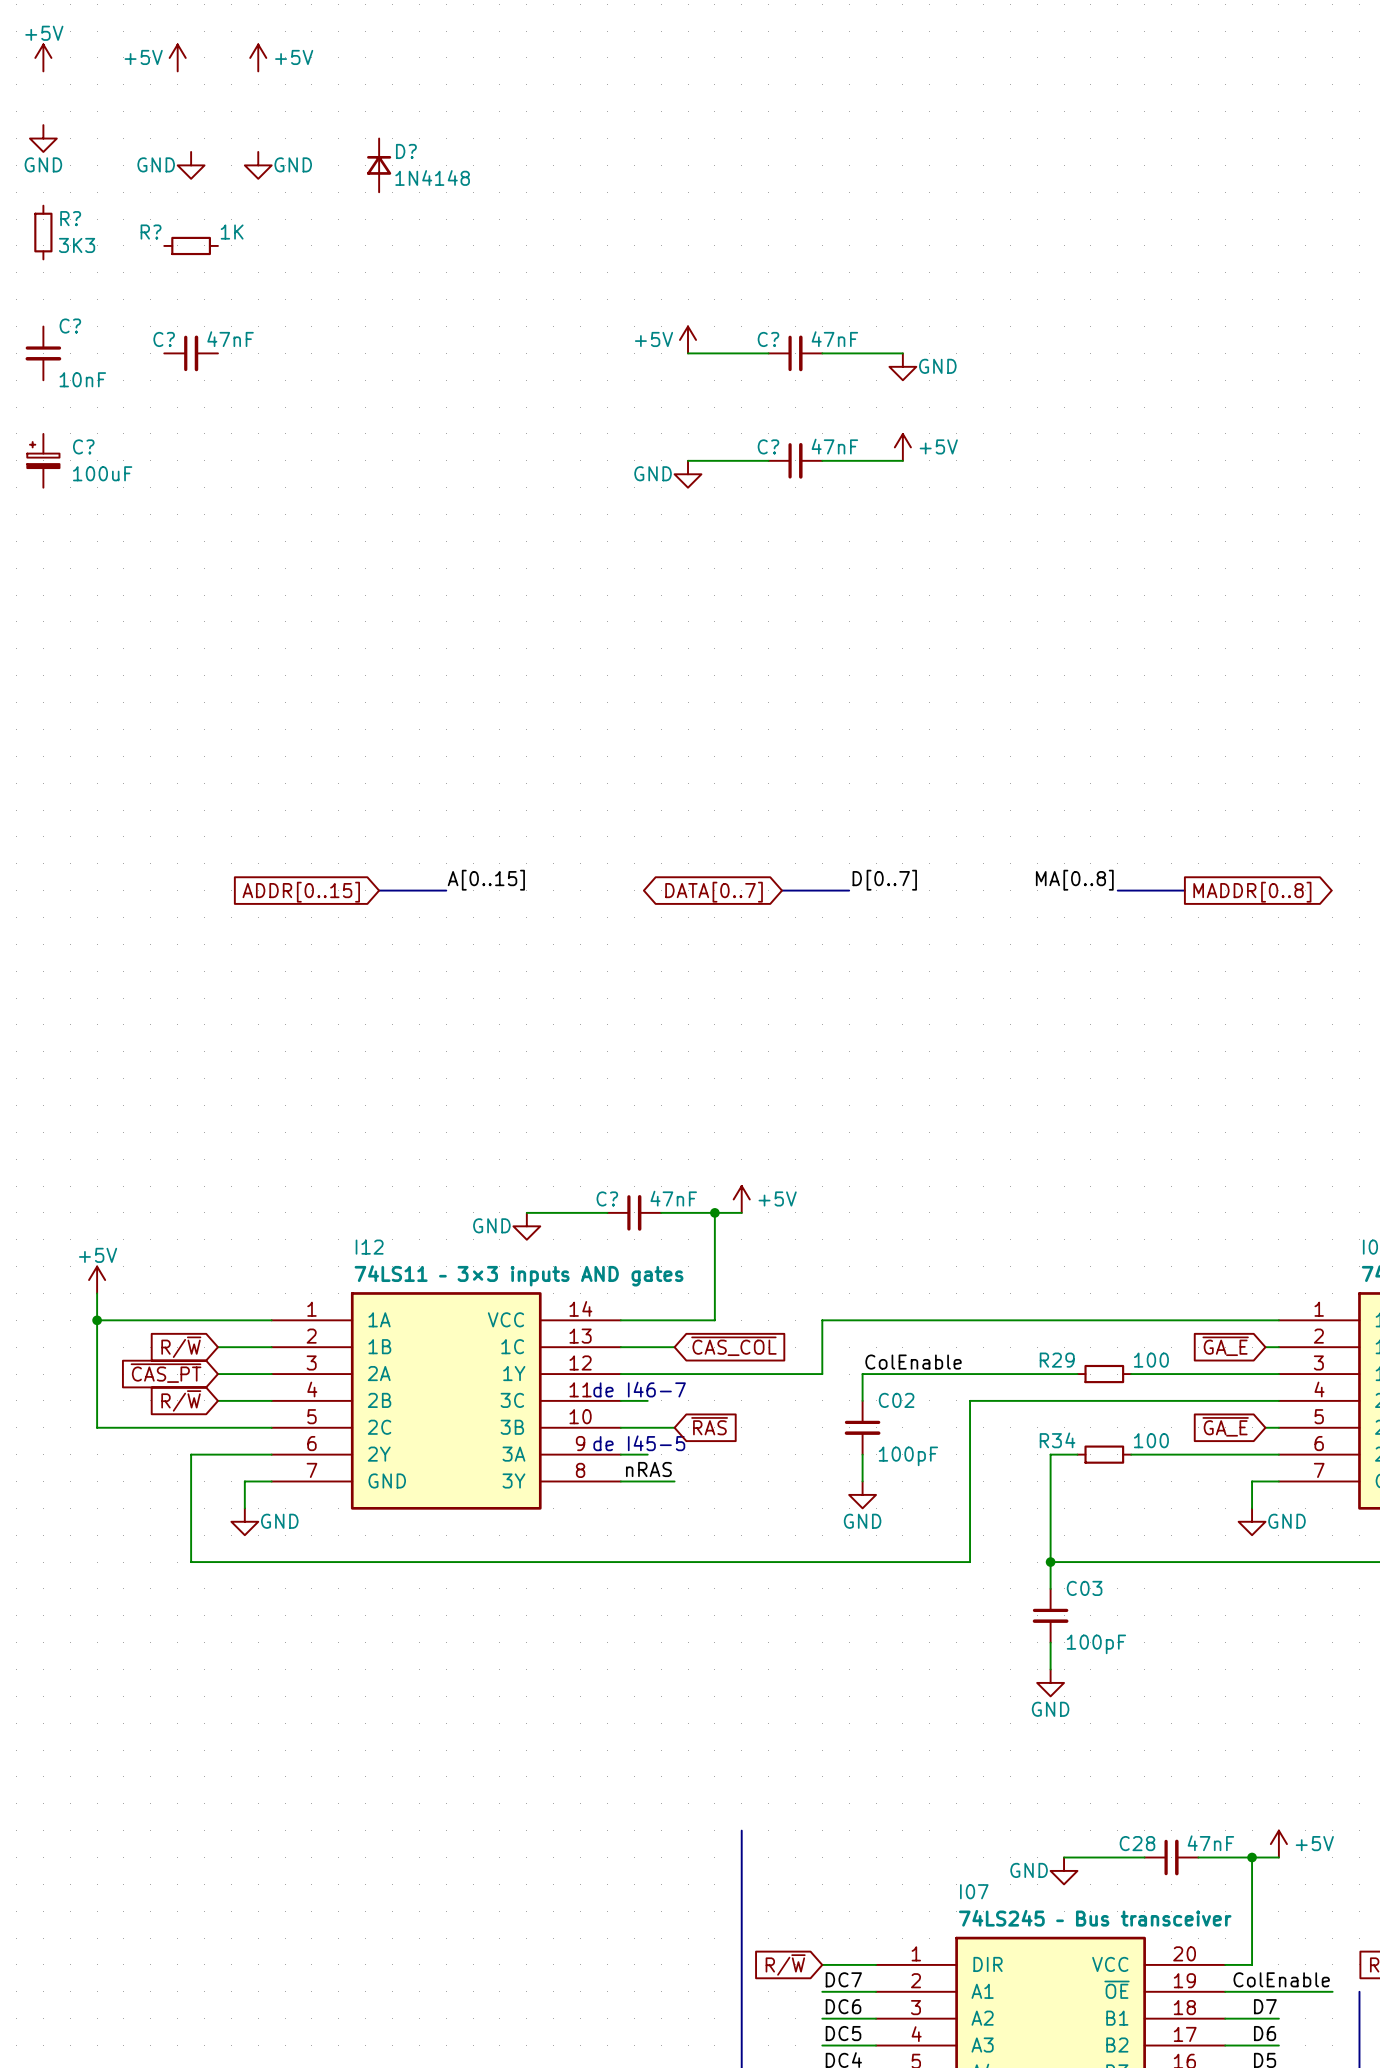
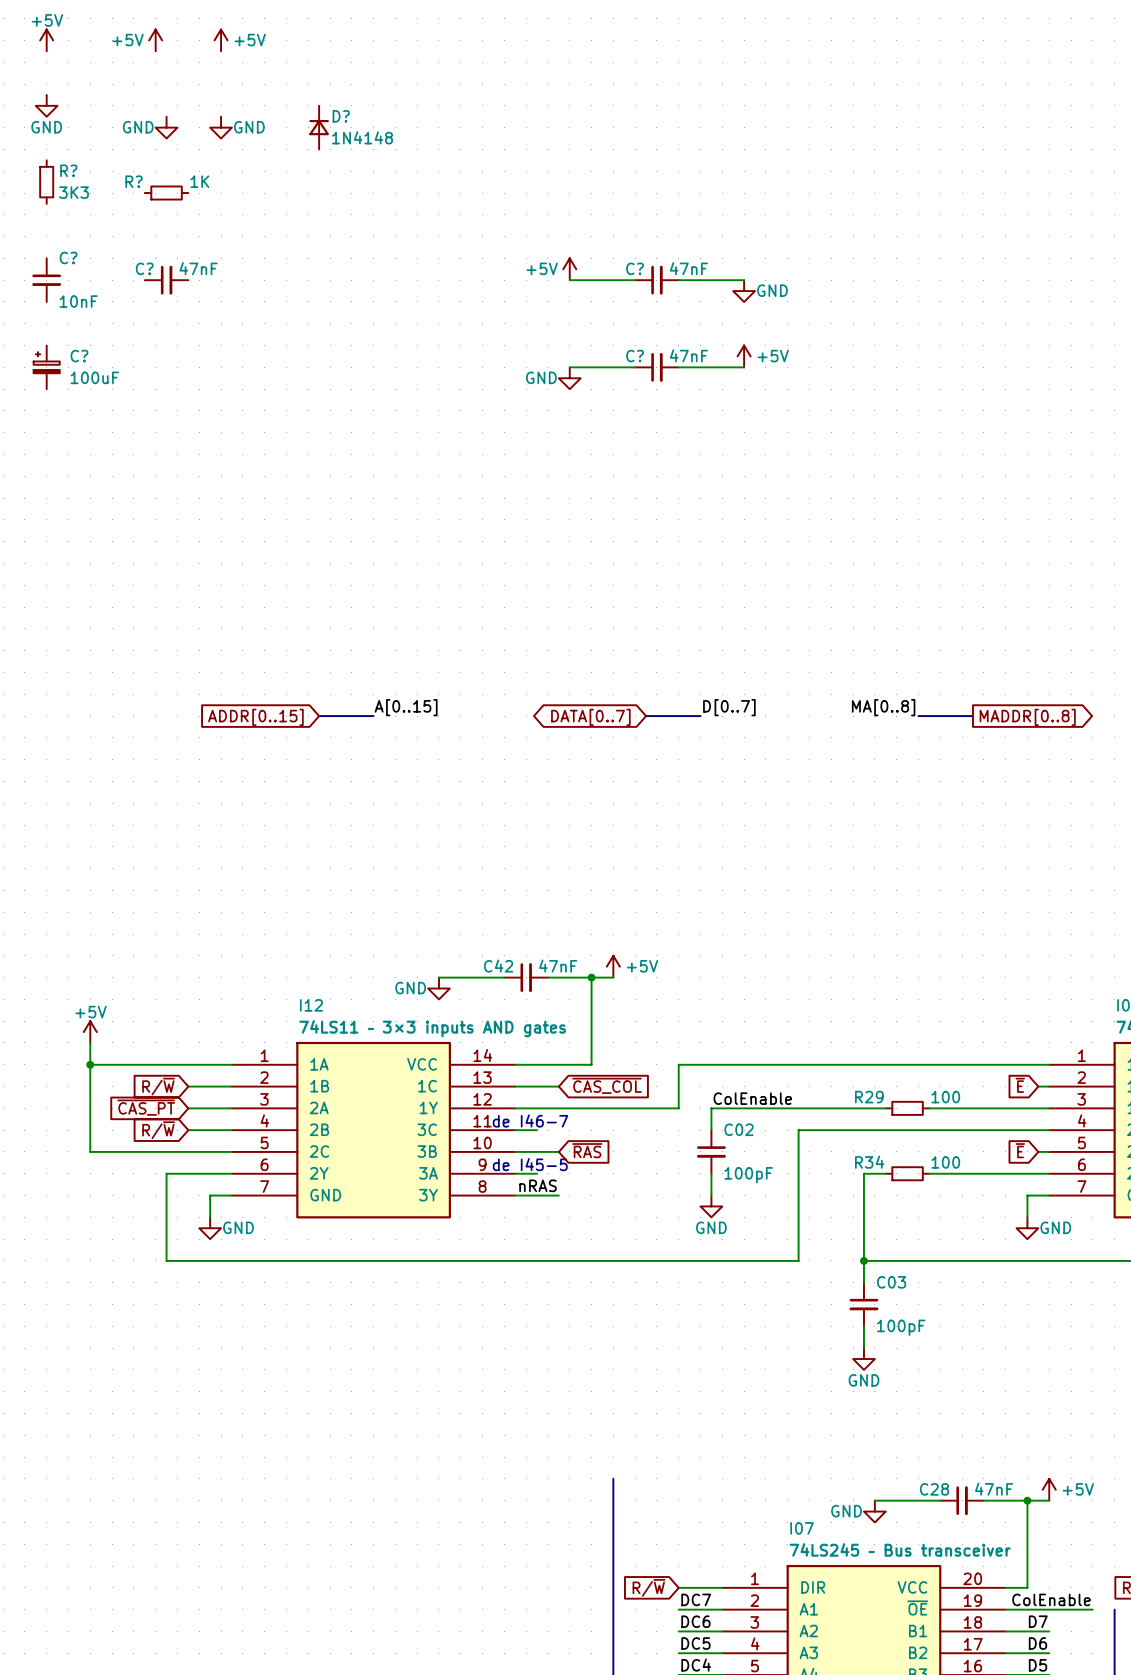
C? name: C? (607, 1198) -> C42 (498, 966)
global label: ~{GA_E} (1225, 1346) -> ~{E} (1020, 1085)
global label: ~{GA_E} (1225, 1426) -> ~{E} (1020, 1150)

